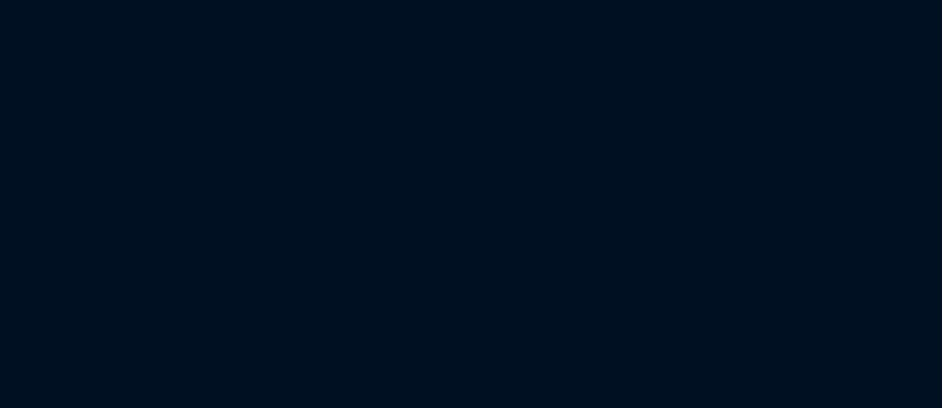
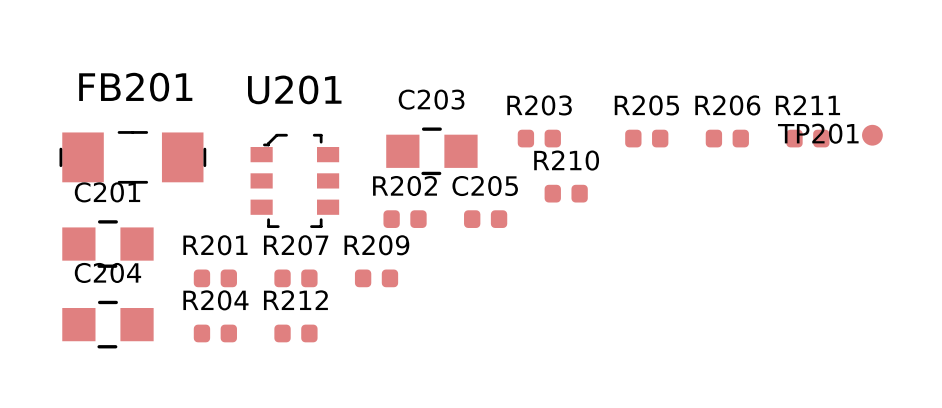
TP201: none -> (872, 135)
R203: none -> (539, 138)
R205: none -> (646, 138)
R206: none -> (727, 138)
R211: none -> (807, 138)
C203: none -> (431, 151)
FB201: none -> (132, 157)
U201: none -> (294, 180)
R210: none -> (566, 193)
R202: none -> (405, 219)
C205: none -> (485, 219)
C201: none -> (107, 244)
R201: none -> (215, 278)
R207: none -> (295, 278)
R209: none -> (376, 278)
C204: none -> (107, 324)
R204: none -> (215, 333)
R212: none -> (295, 333)

